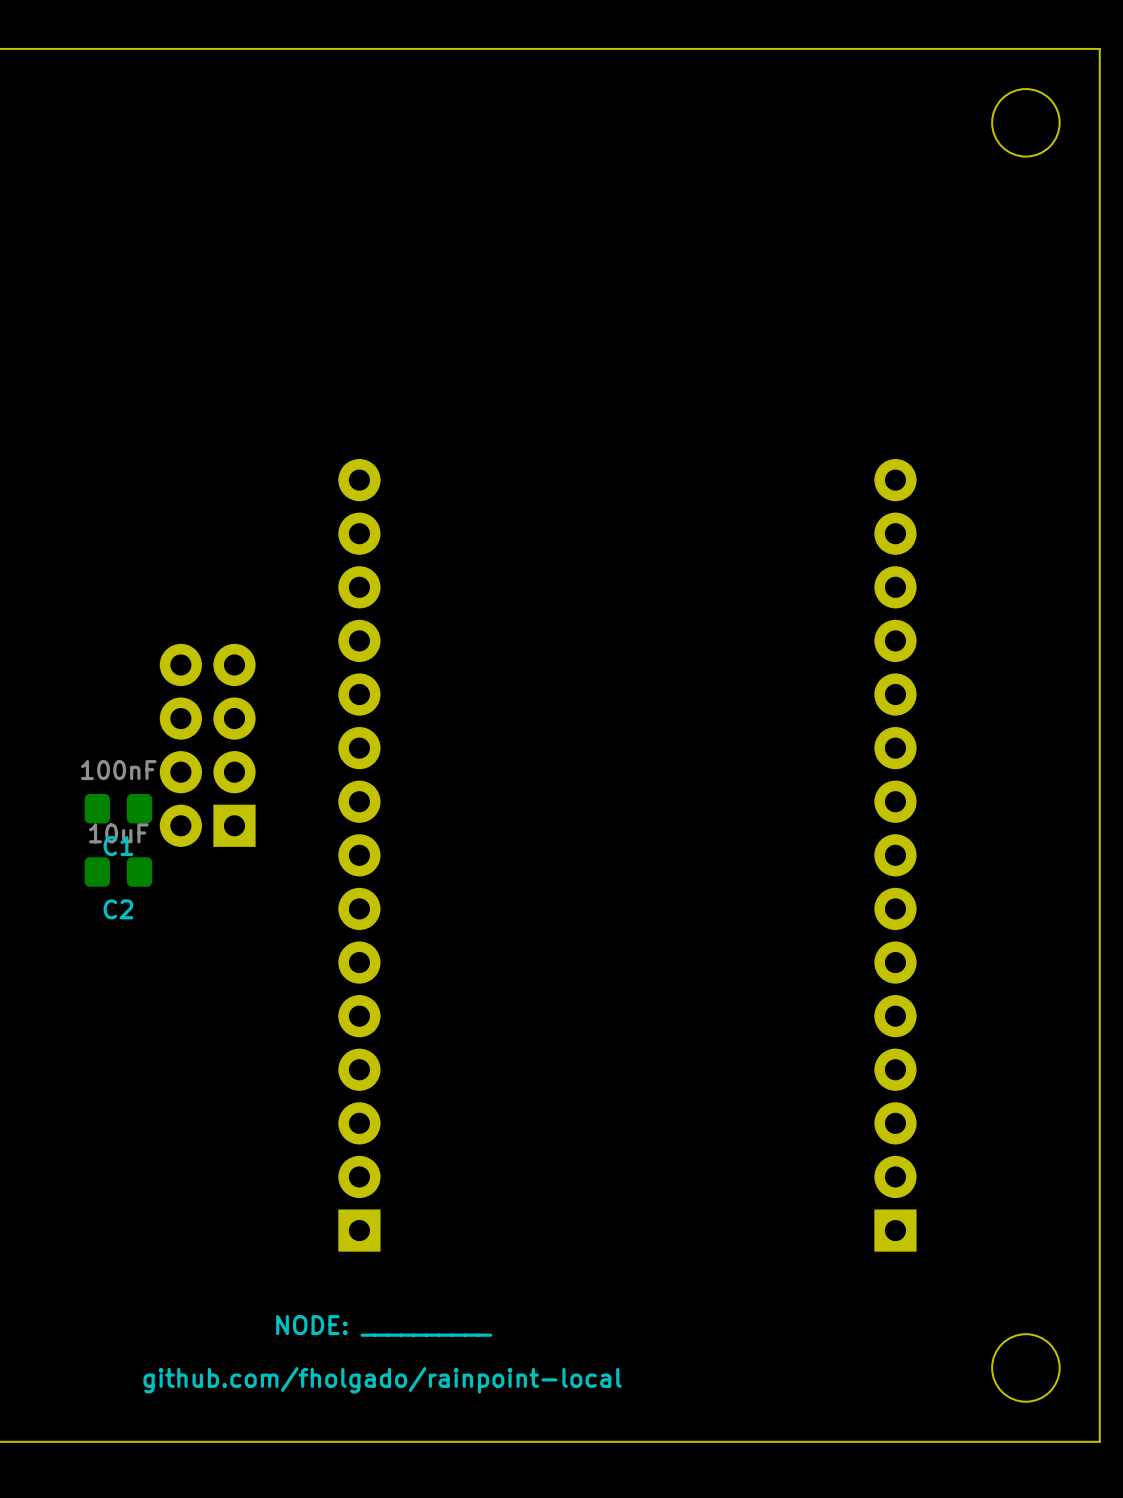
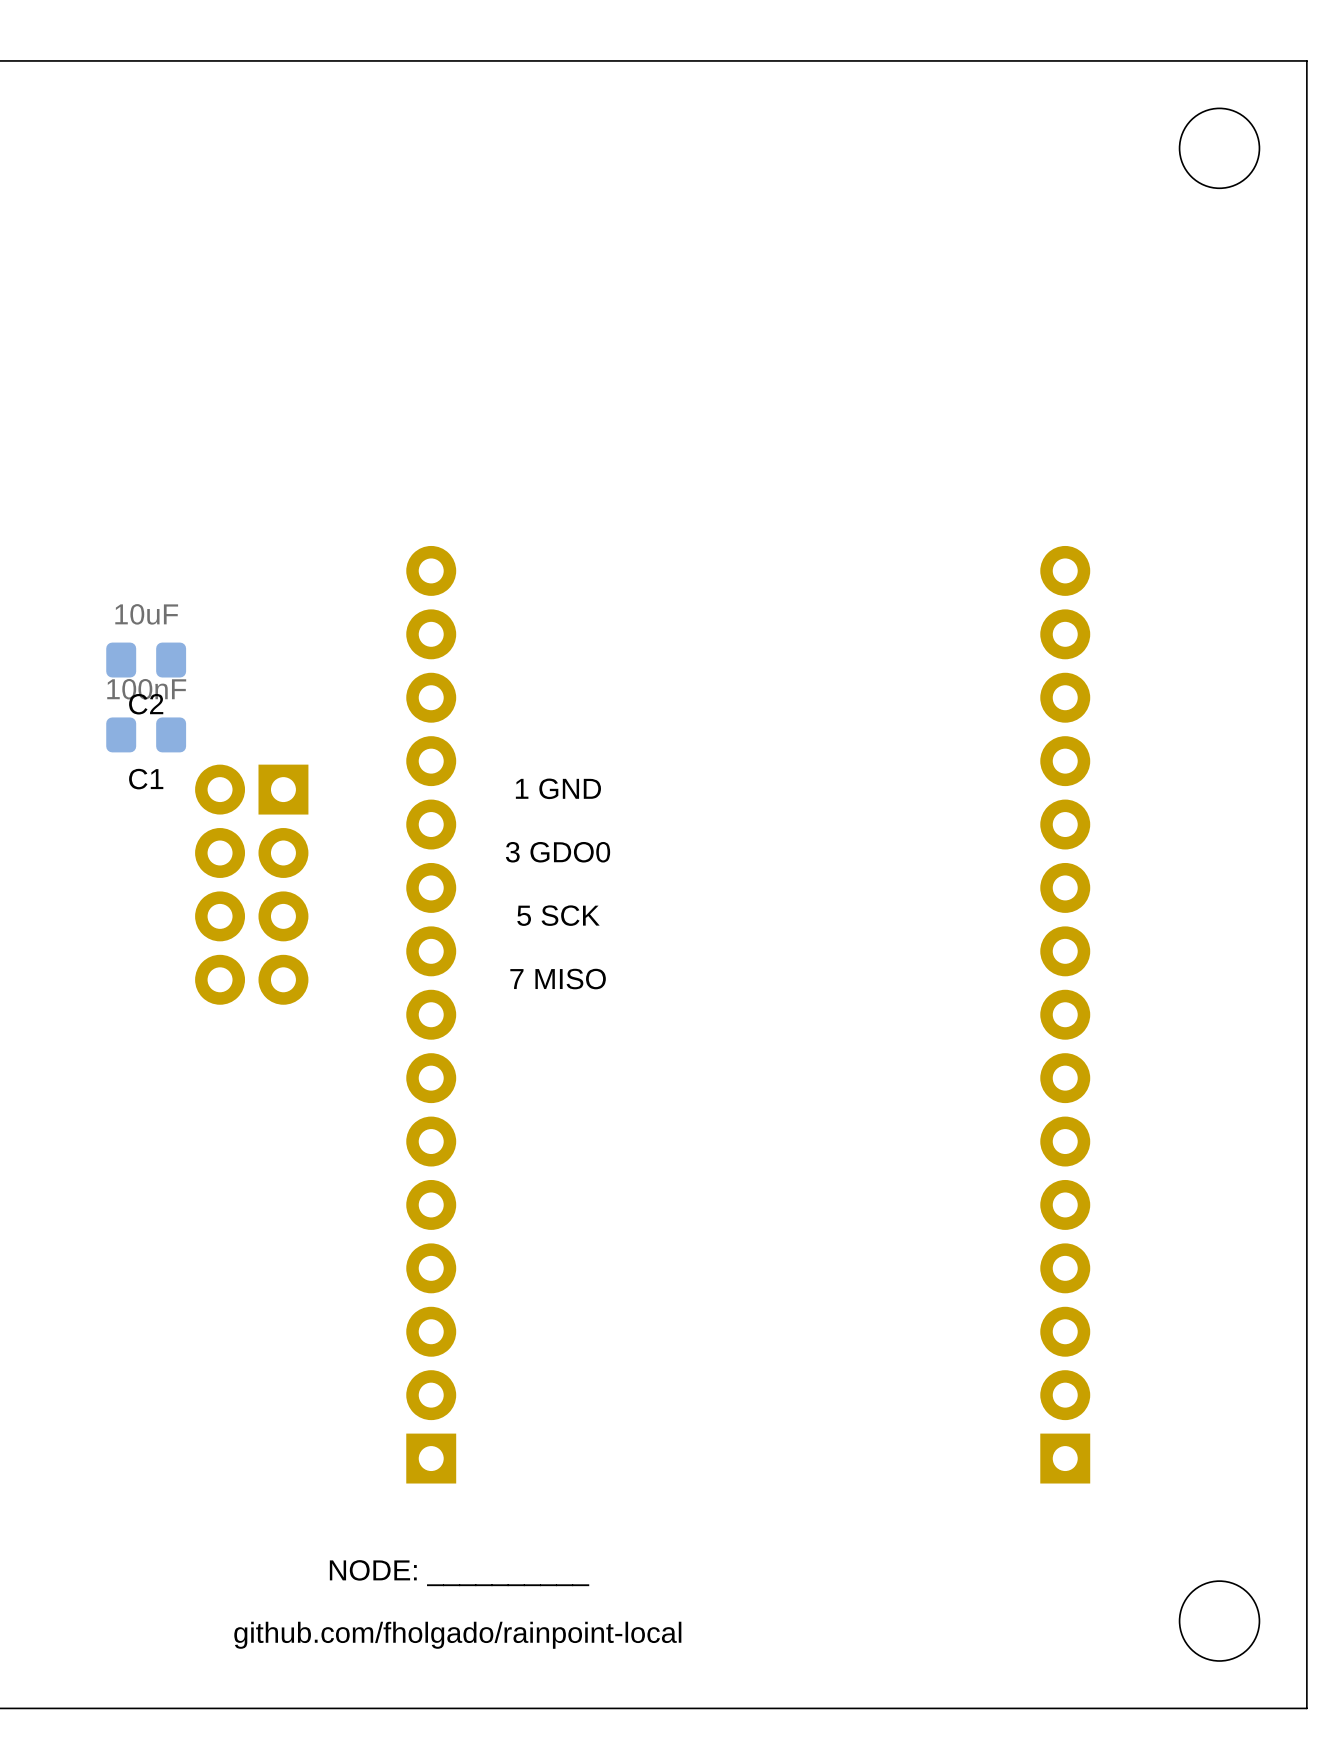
part footprint: [159, 643, 256, 847] -> [195, 764, 309, 1005]
text: none -> 1 GND (558, 788)
text: none -> 3 GDO0 (558, 852)
text: none -> 5 SCK (558, 915)
C1 position: (118, 808) -> (146, 734)
text: none -> 7 MISO (558, 979)
C2 position: (118, 872) -> (146, 660)

